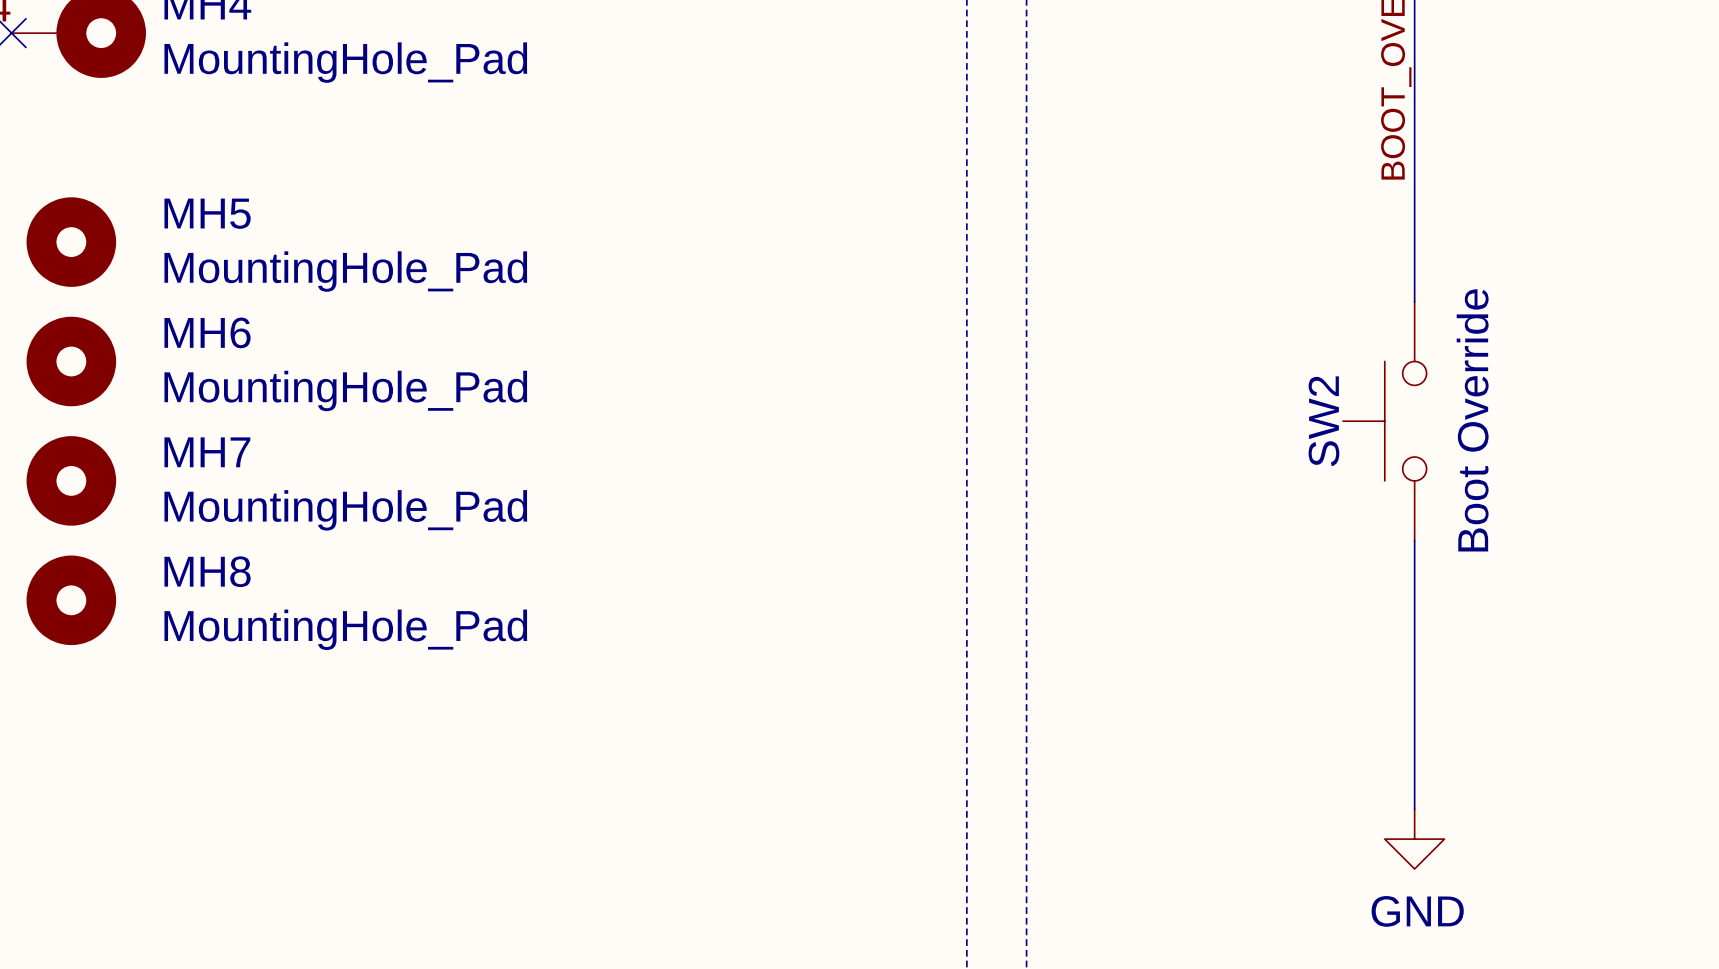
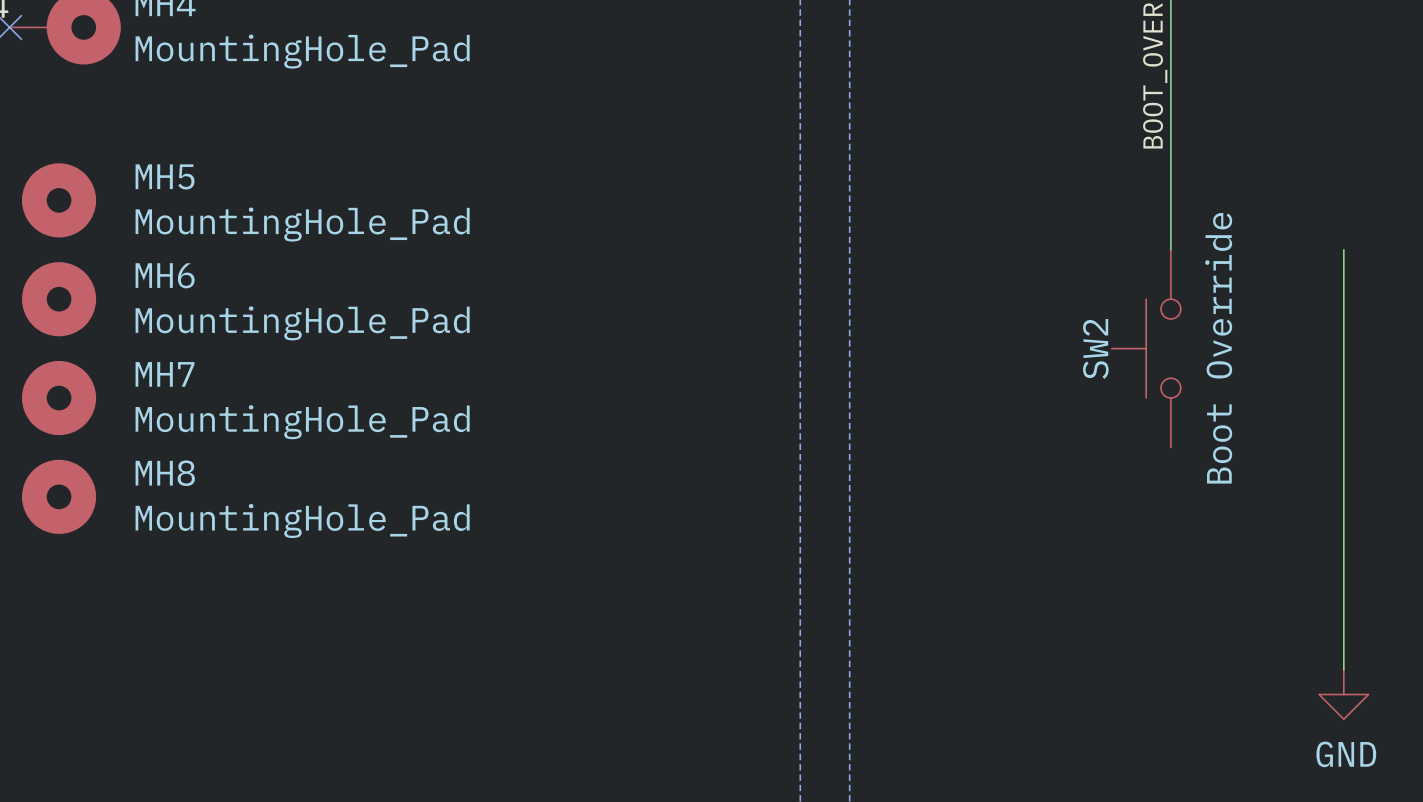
wire: none -> (1343, 249) (1343, 669)
wire: (1414, 540) (1414, 809) -> none
power symbol: GND (1414, 839) -> none
power symbol: none -> GND (1343, 694)

